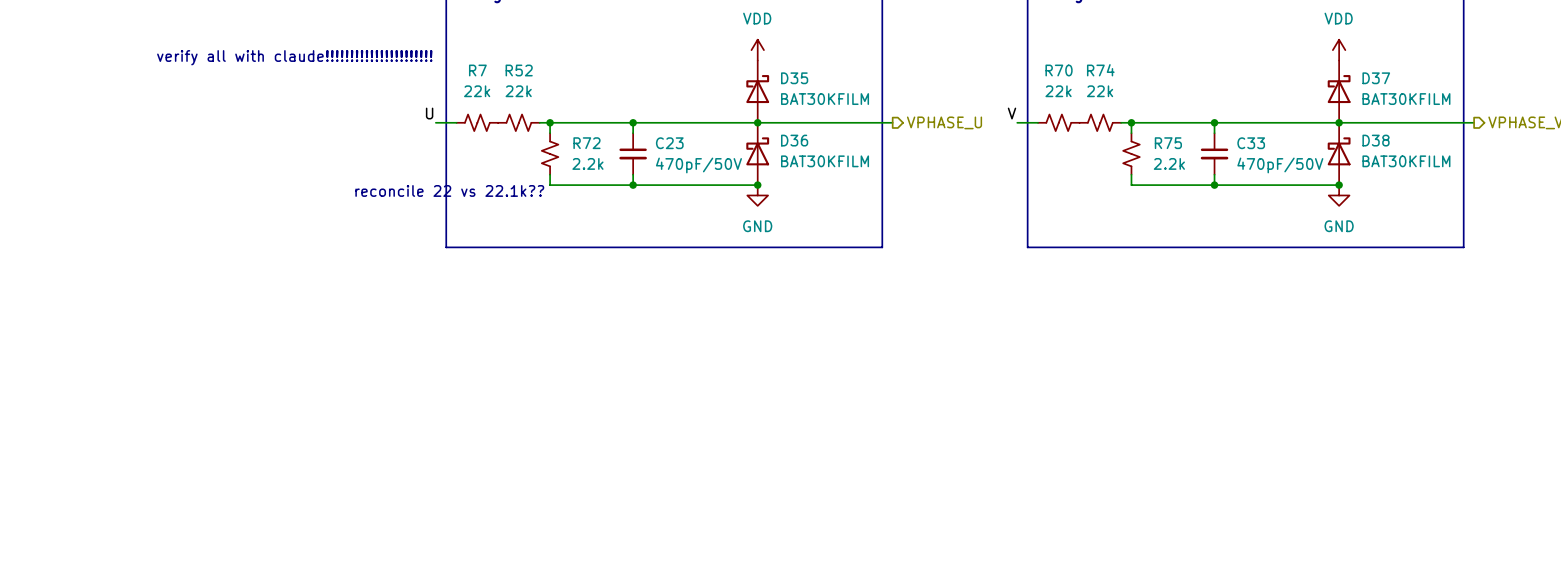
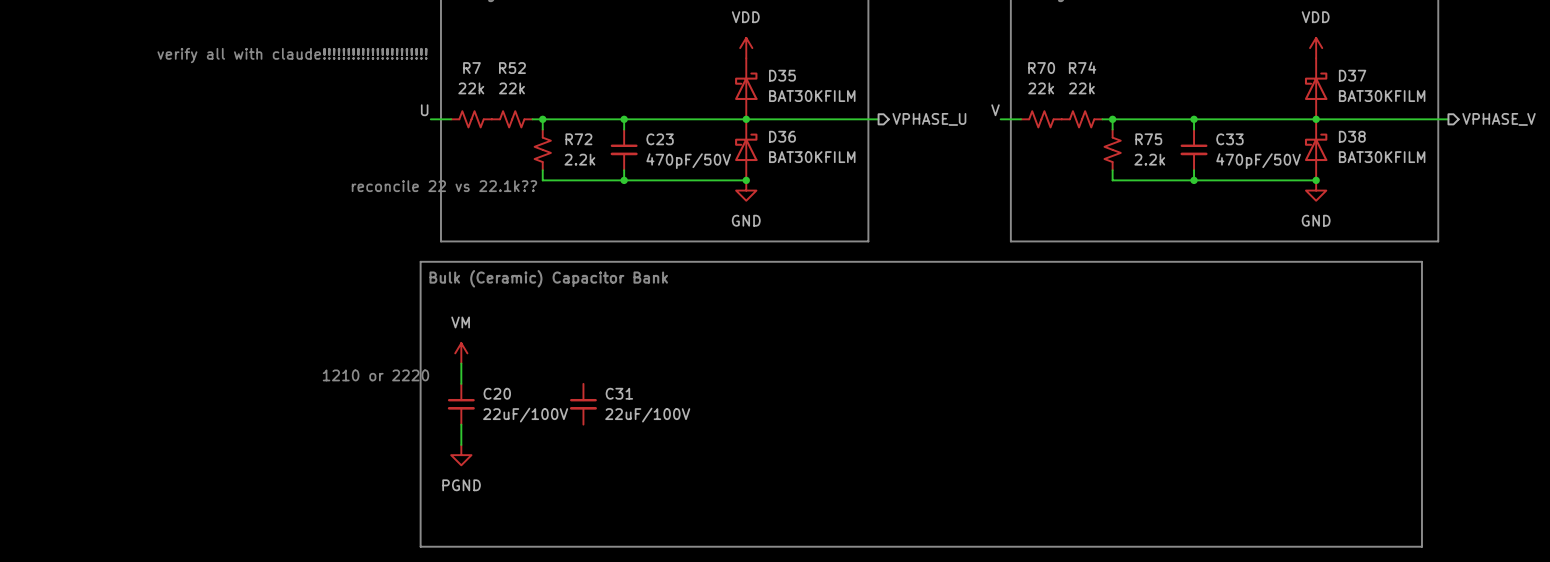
line: none -> (420, 261) (1421, 261) (1421, 546) (420, 546) (420, 261)
text: none -> Bulk (Ceramic) Capacitor Bank (548, 278)
power symbol: none -> VM (461, 353)
wire: none -> (461, 363) (461, 383)
text: none -> 1210 or 2220 (375, 375)
C20: none -> 22uF/100V (461, 404)
C31: none -> 22uF/100V (583, 404)
wire: none -> (461, 424) (461, 444)
power symbol: none -> PGND (461, 455)

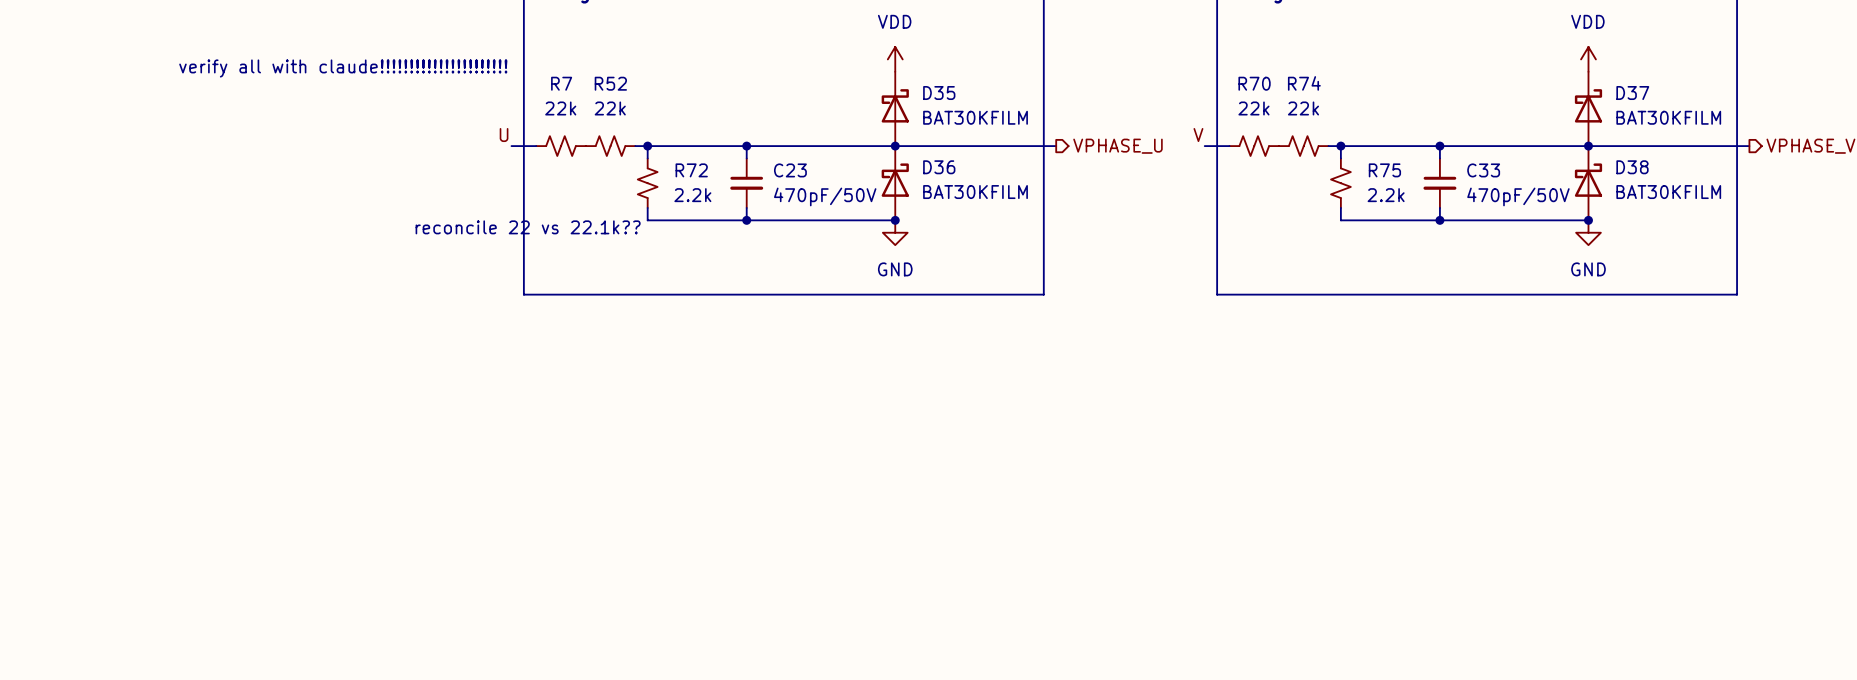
line: (420, 261) (1421, 261) (1421, 546) (420, 546) (420, 261) -> none
text: Bulk (Ceramic) Capacitor Bank (548, 278) -> none
power symbol: VM (461, 353) -> none
wire: (461, 363) (461, 383) -> none
text: 1210 or 2220 (375, 375) -> none
C20: 22uF/100V (461, 404) -> none
C31: 22uF/100V (583, 404) -> none
wire: (461, 424) (461, 444) -> none
power symbol: PGND (461, 455) -> none

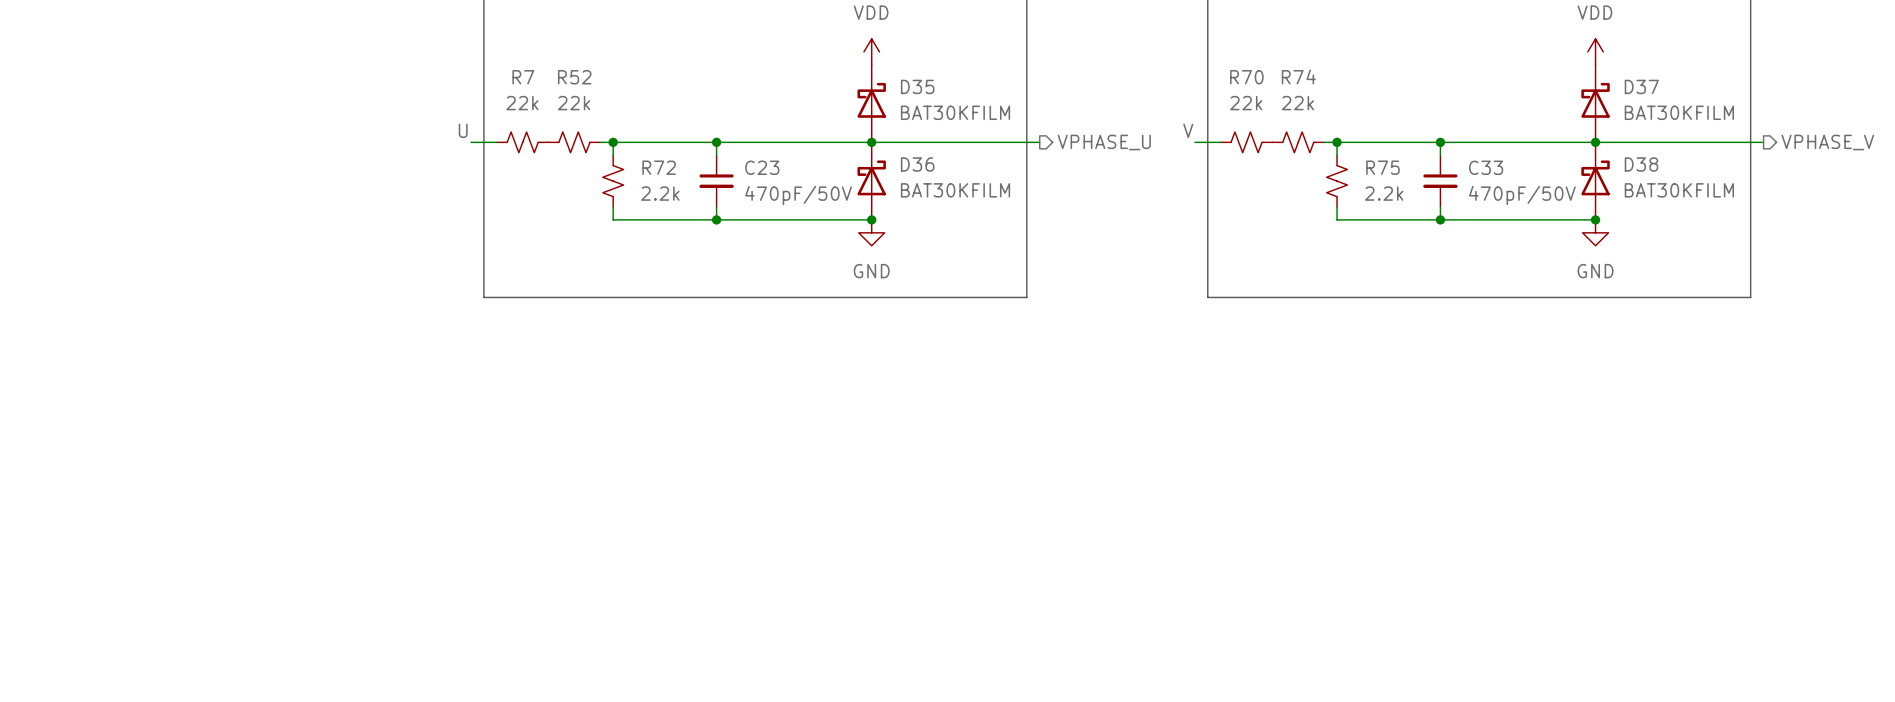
text: verify all with claude!!!!!!!!!!!!!!!!!!!!!! (343, 68) -> none
text: reconcile 22 vs 22.1k?? (528, 227) -> none

